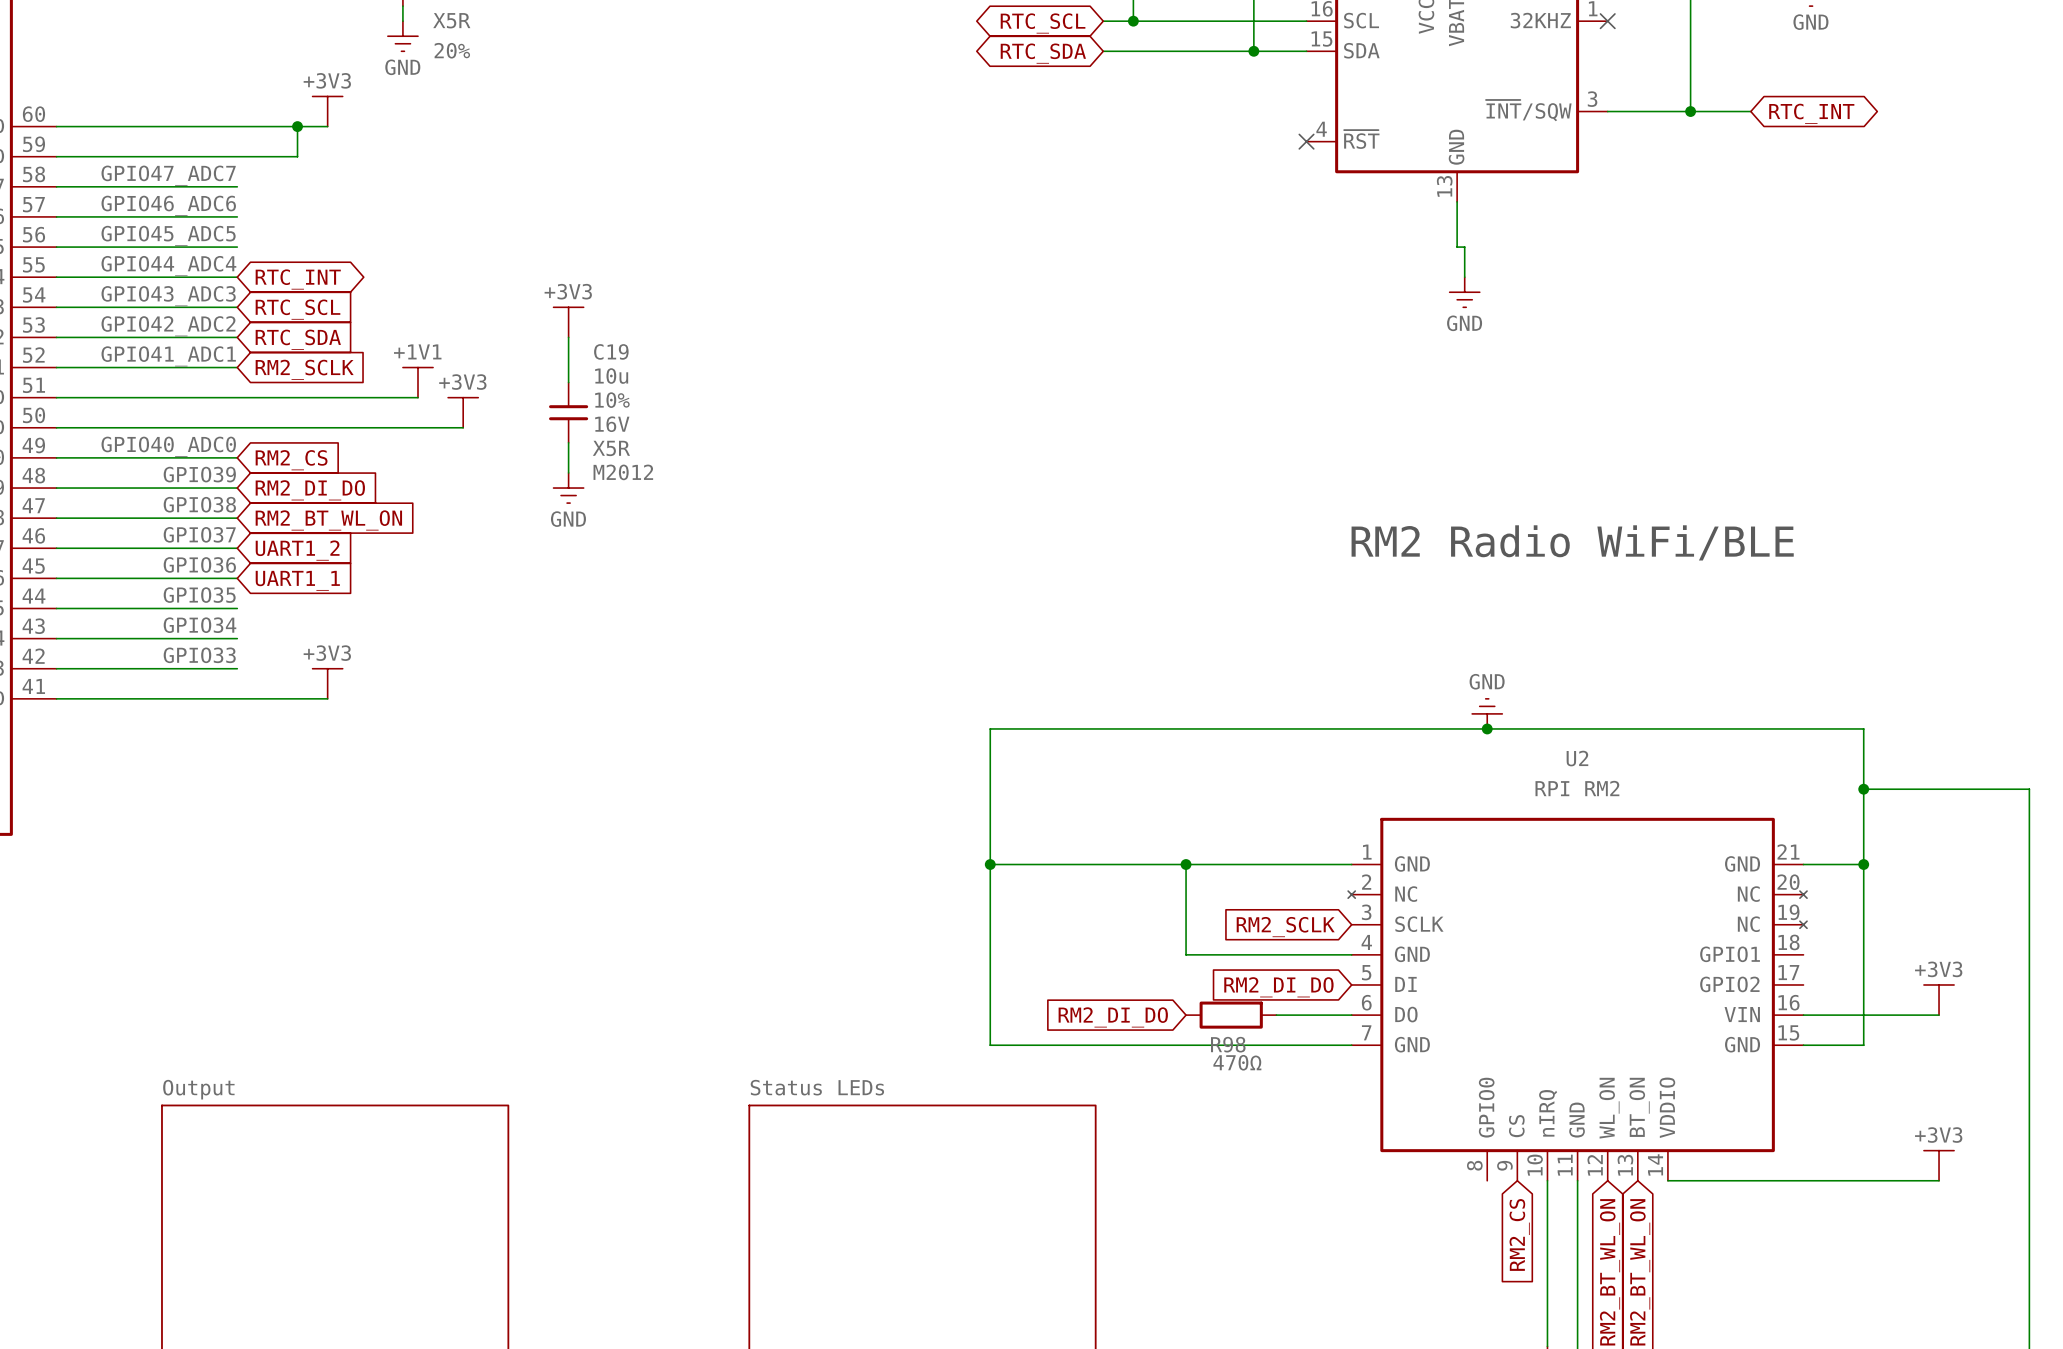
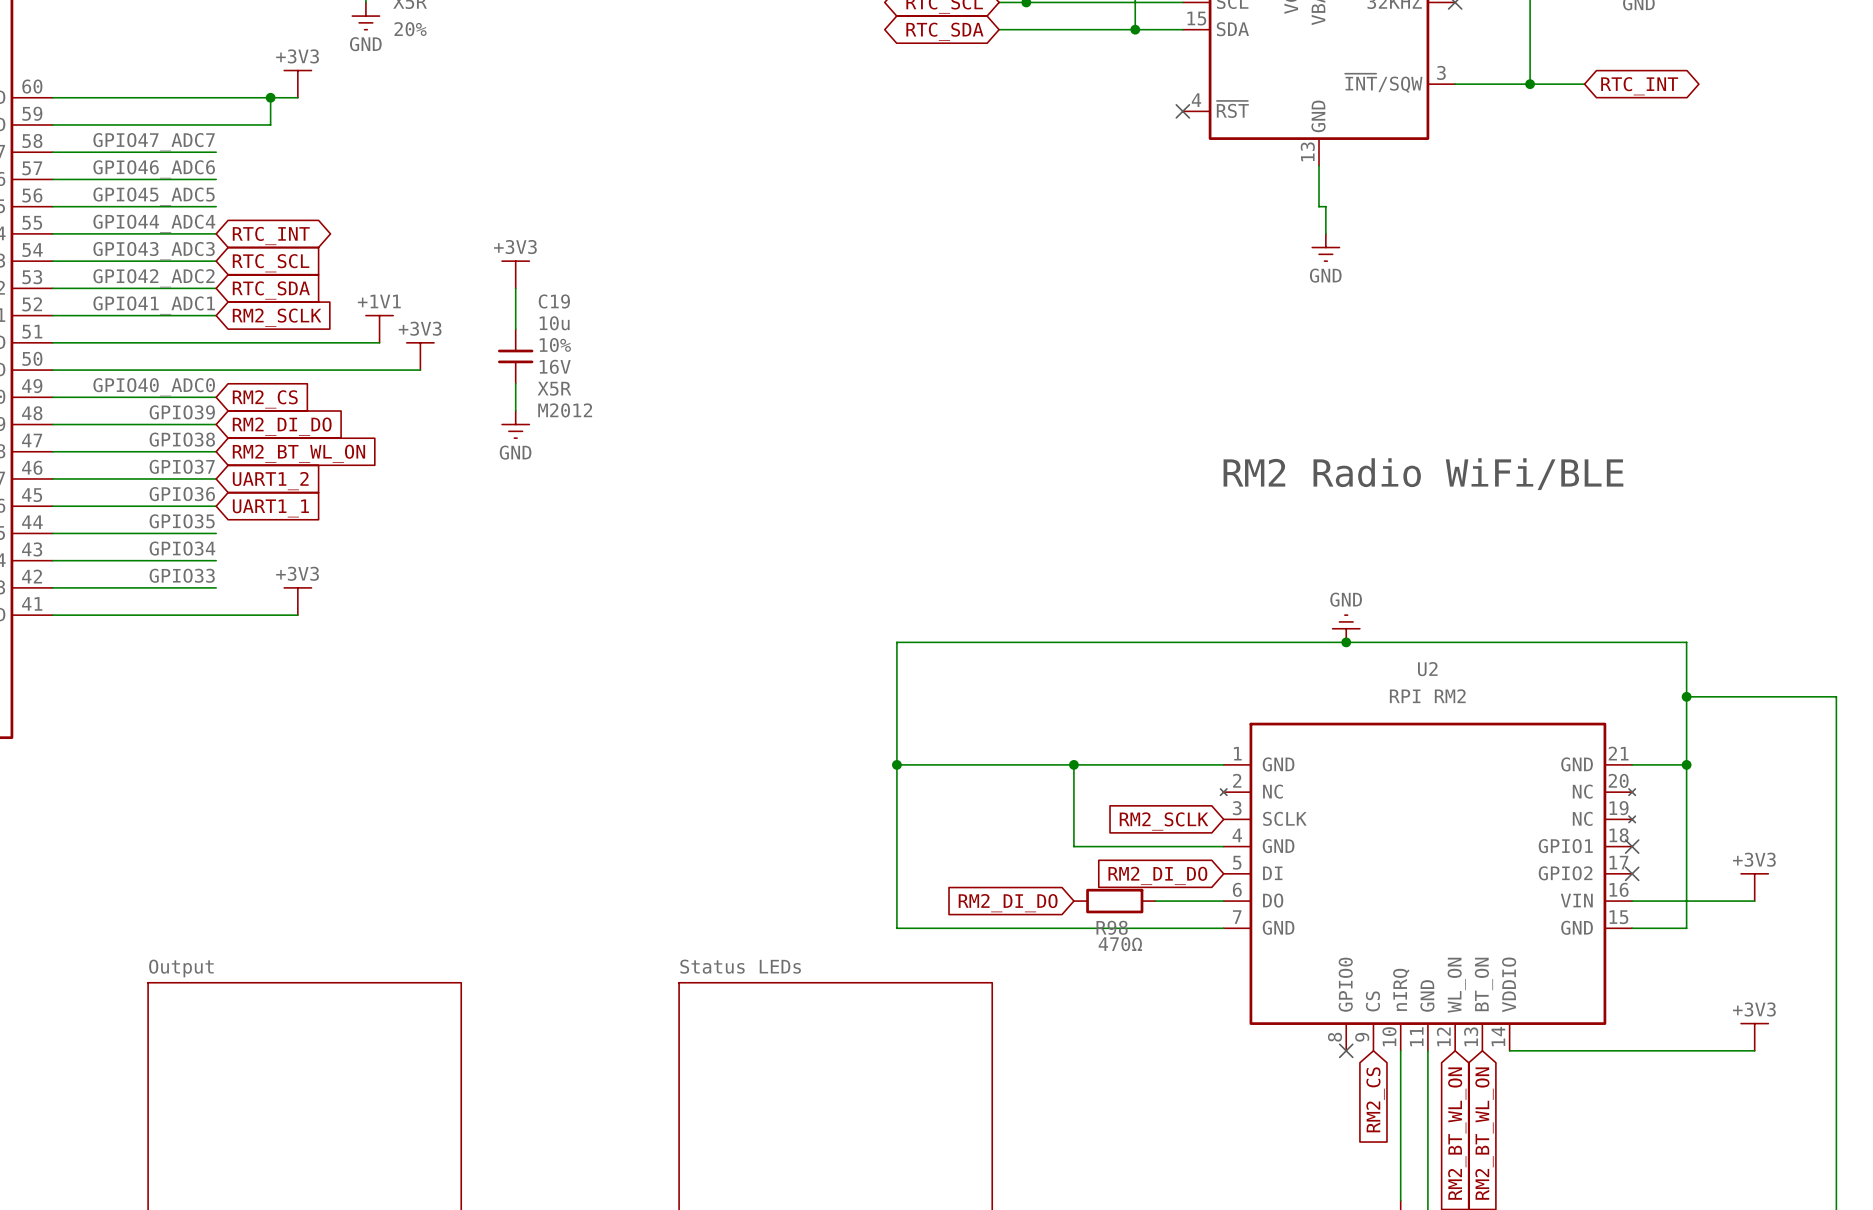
no-connect mark: none -> (1632, 846)
no-connect mark: none -> (1632, 873)
no-connect mark: none -> (1346, 1050)

